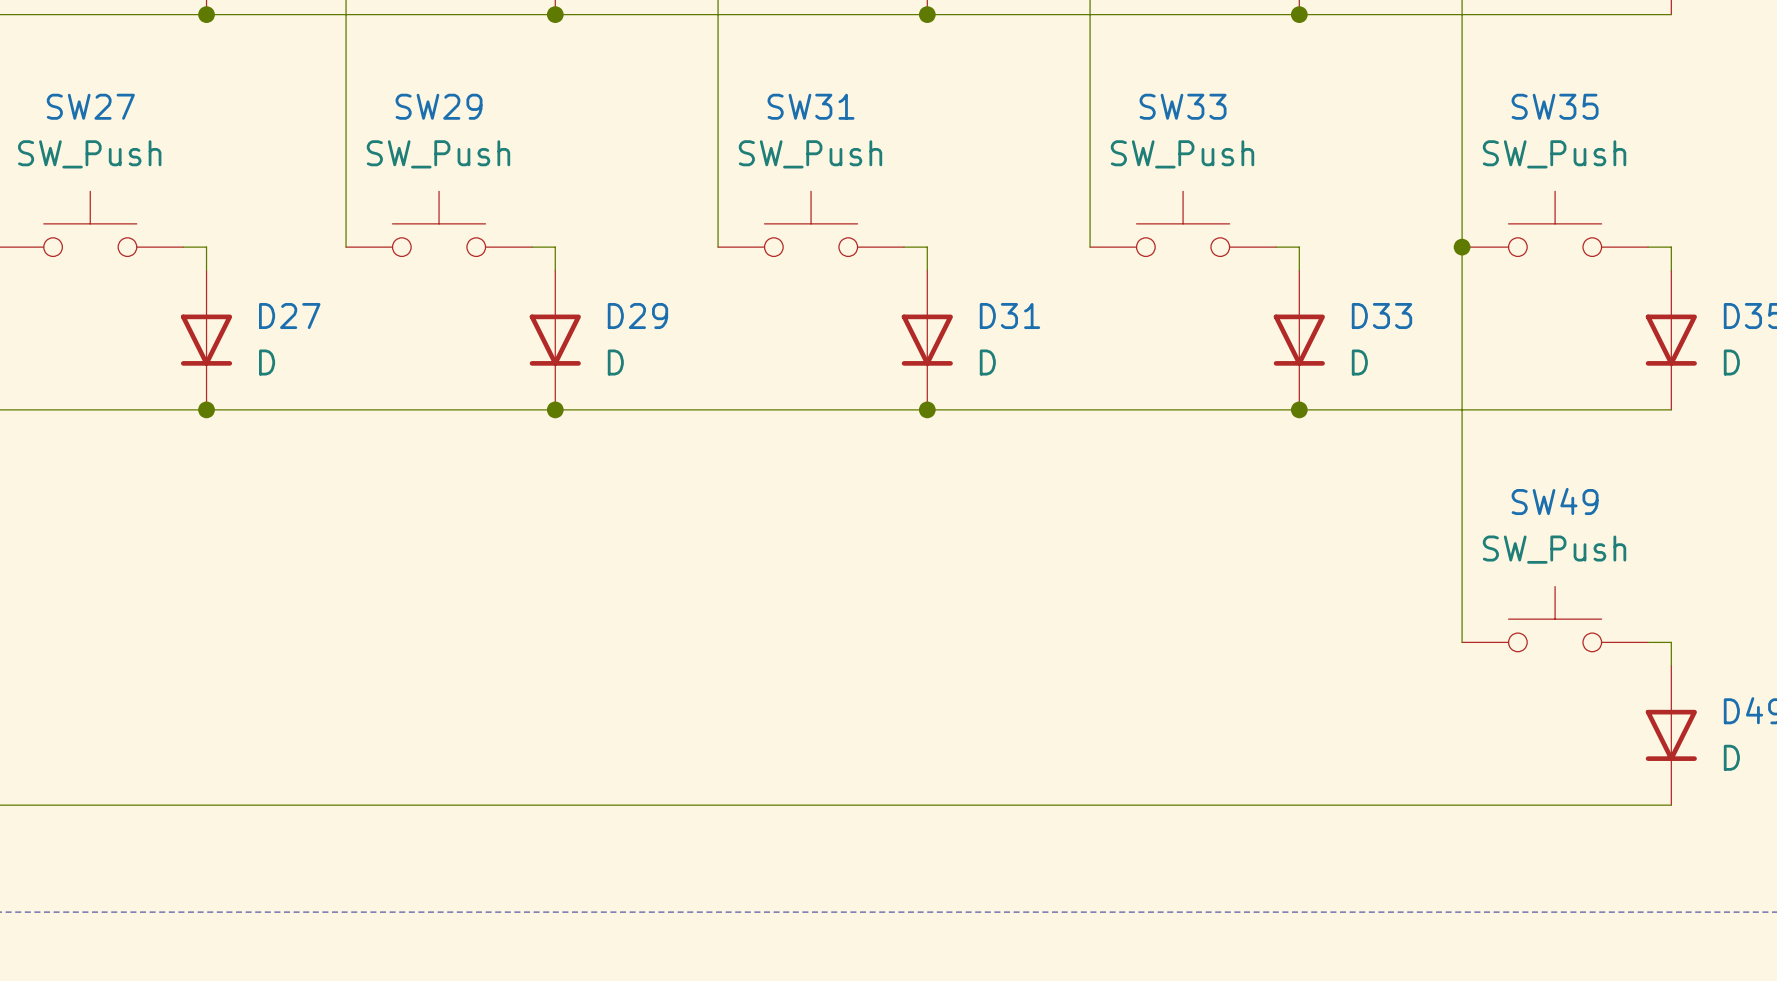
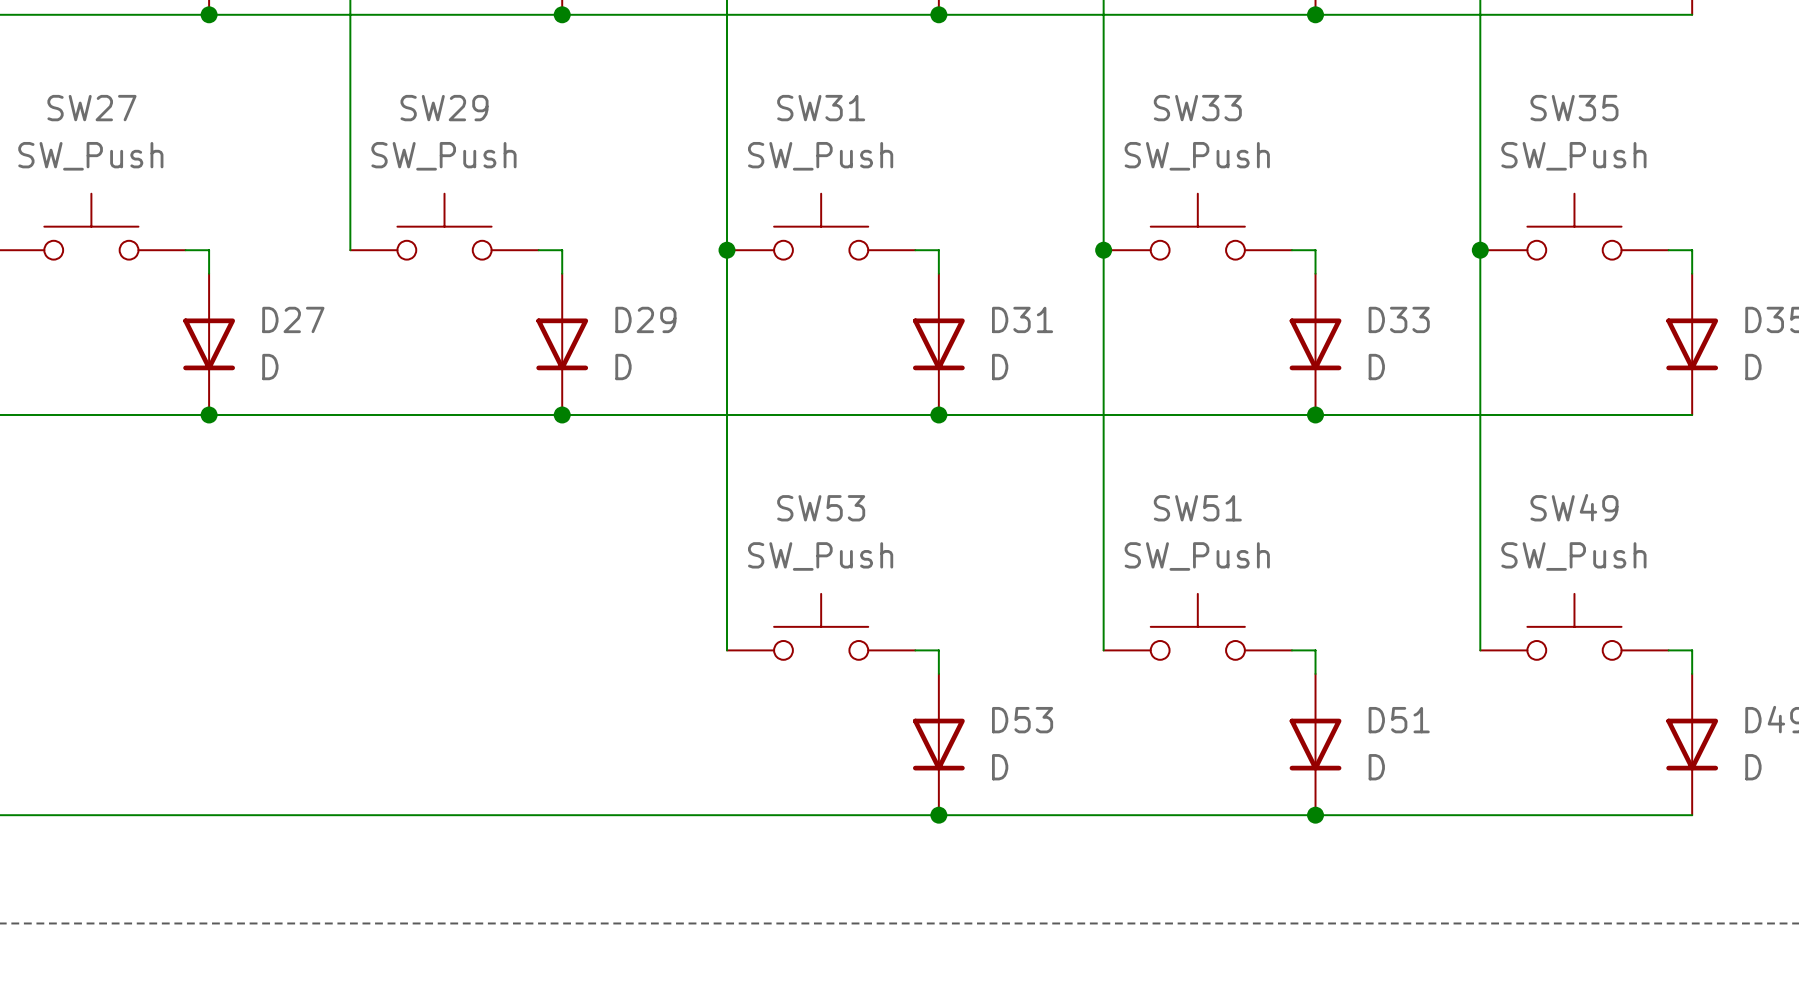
wire: none -> (726, 250) (726, 650)
junction: none -> (726, 250)
wire: none -> (1103, 250) (1103, 650)
junction: none -> (1103, 250)
SW53: none -> SW_Push (821, 626)
SW51: none -> SW_Push (1197, 626)
wire: none -> (915, 650) (938, 650) (938, 673)
wire: none -> (1291, 650) (1315, 650) (1315, 673)
D53: none -> D (938, 744)
D51: none -> D (1315, 744)
junction: none -> (938, 815)
junction: none -> (1315, 815)

